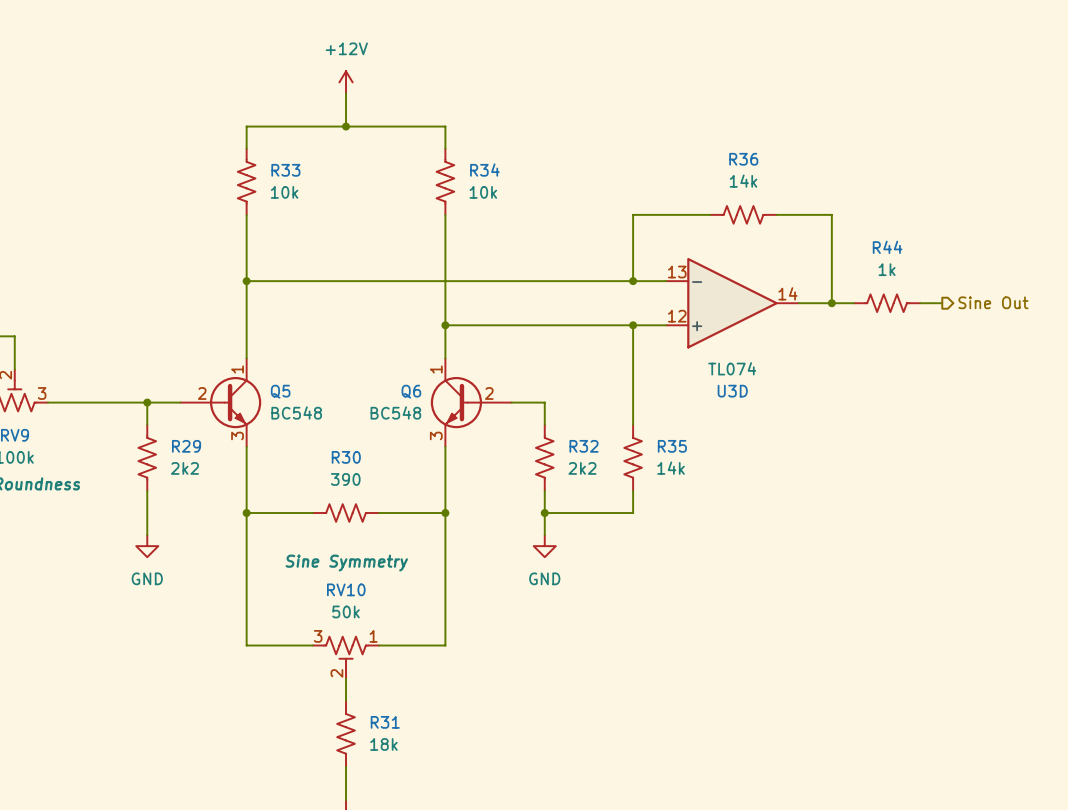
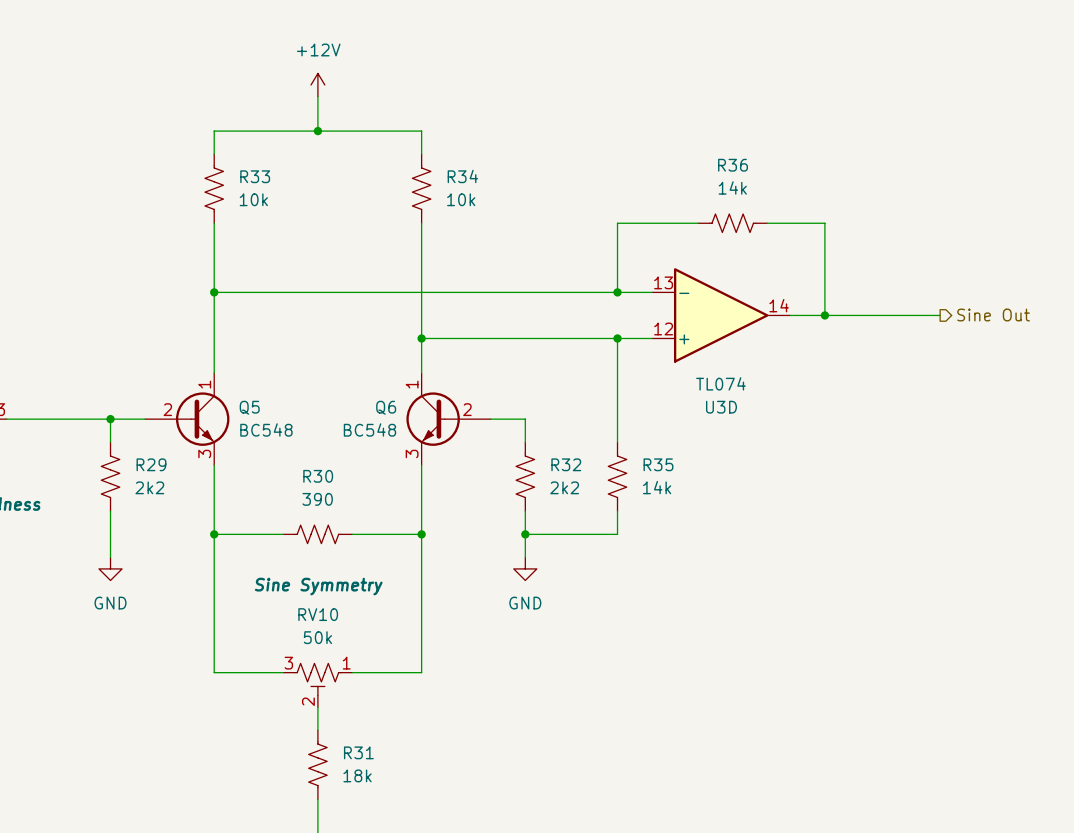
R44: 1k (887, 303) -> none

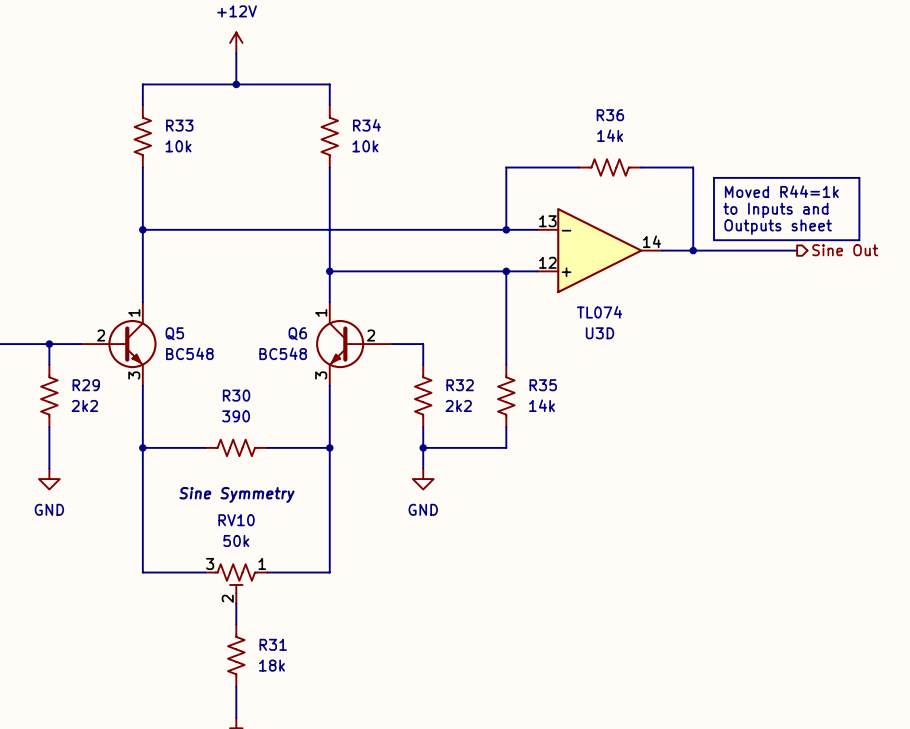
line: none -> (714, 177) (859, 177) (859, 240) (714, 240) (714, 177)
text: none -> Moved R44=1k (781, 191)
text: none -> to Inputs and (775, 210)
text: none -> Outputs sheet (778, 227)

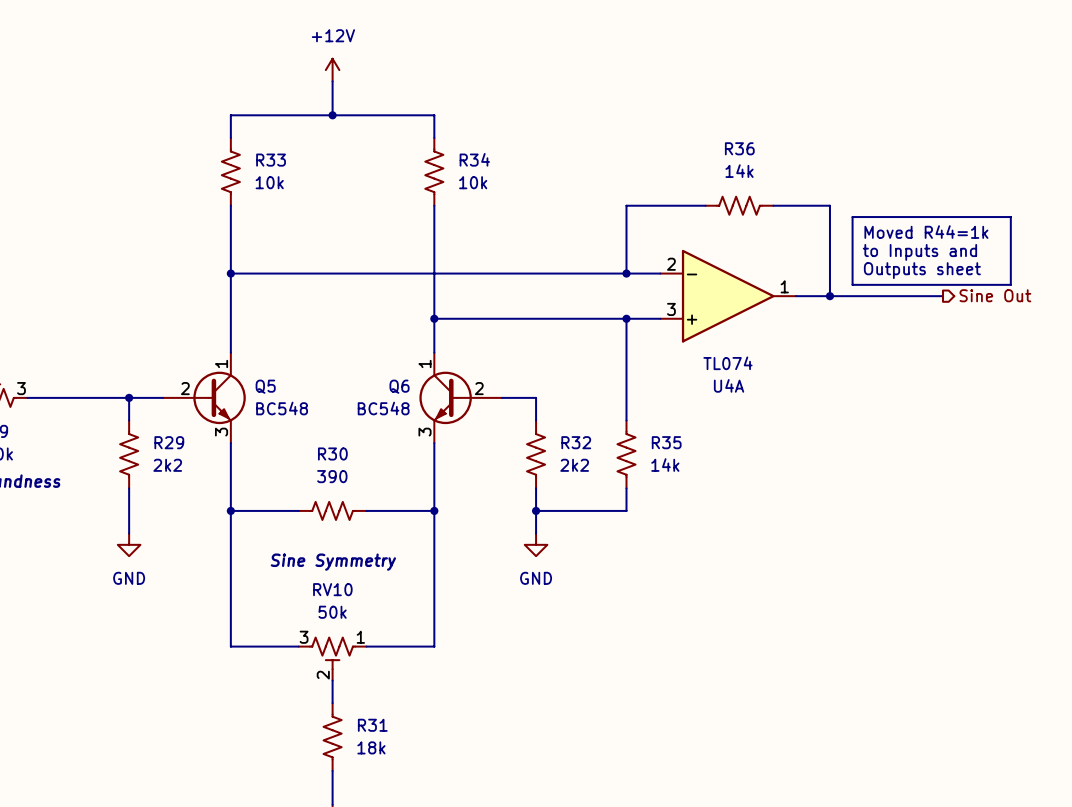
U3D pin number: 13 (547, 221) -> 2 (671, 264)
U3D pin number: 14 (651, 241) -> 1 (784, 286)
U3D pin number: 12 (547, 262) -> 3 (671, 309)
U3D name: U3D (600, 333) -> U4A (729, 385)

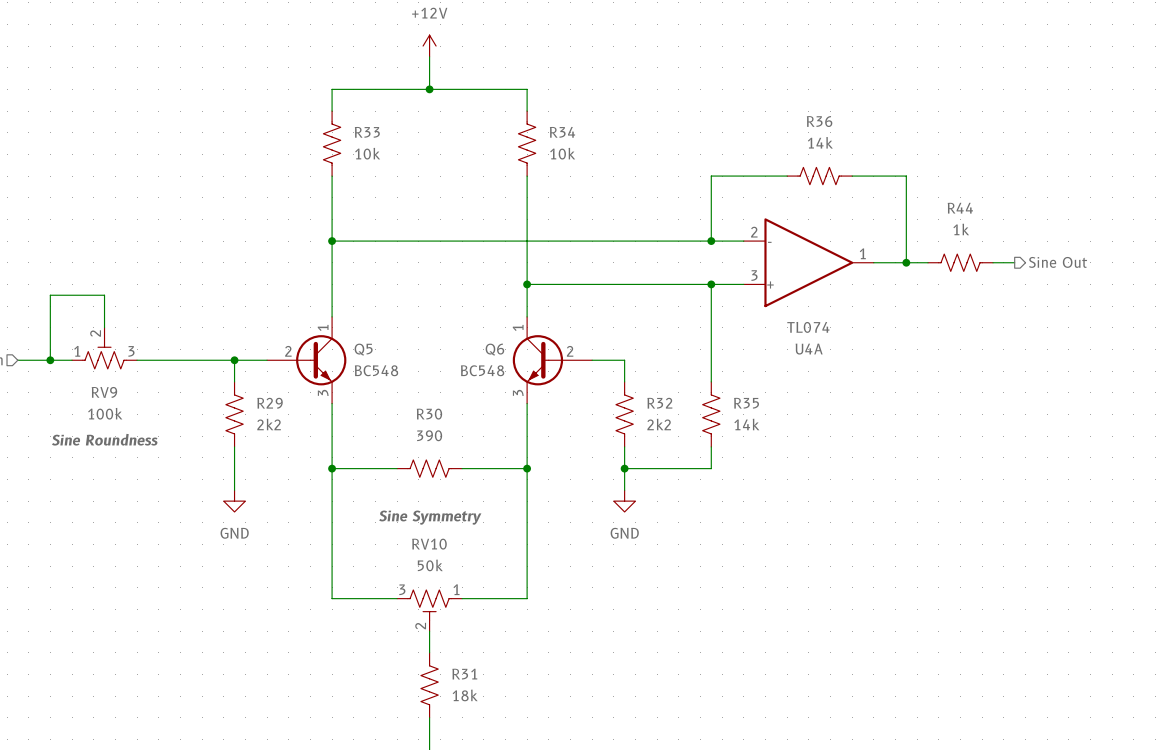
line: (852, 217) (1010, 217) (1010, 284) (852, 284) (852, 217) -> none
text: Moved R44=1k (926, 232) -> none
text: to Inputs and (919, 252) -> none
text: Outputs sheet (922, 270) -> none
R44: none -> 1k (960, 262)

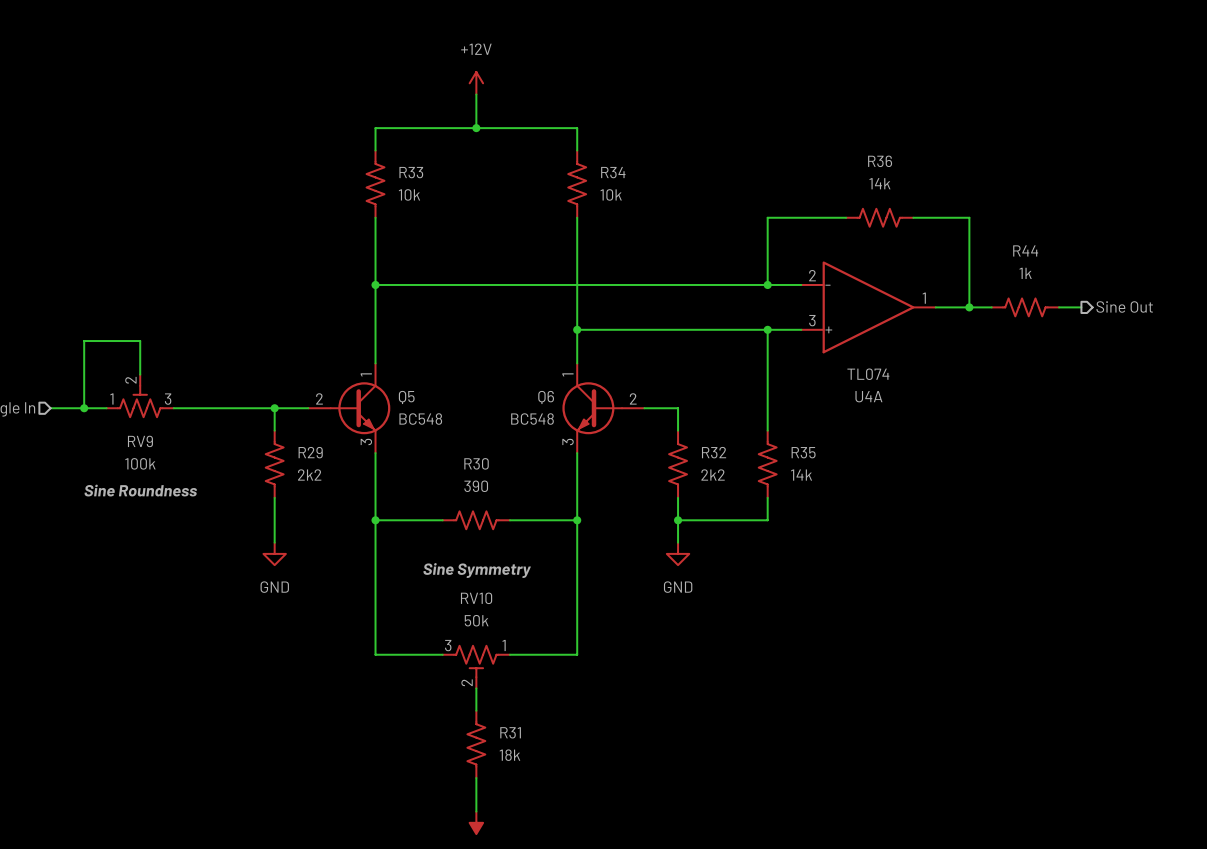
Q5 symbol: [267, 316, 347, 404] -> [308, 363, 391, 454]
Q6 symbol: [512, 316, 593, 404] -> [562, 363, 645, 454]

